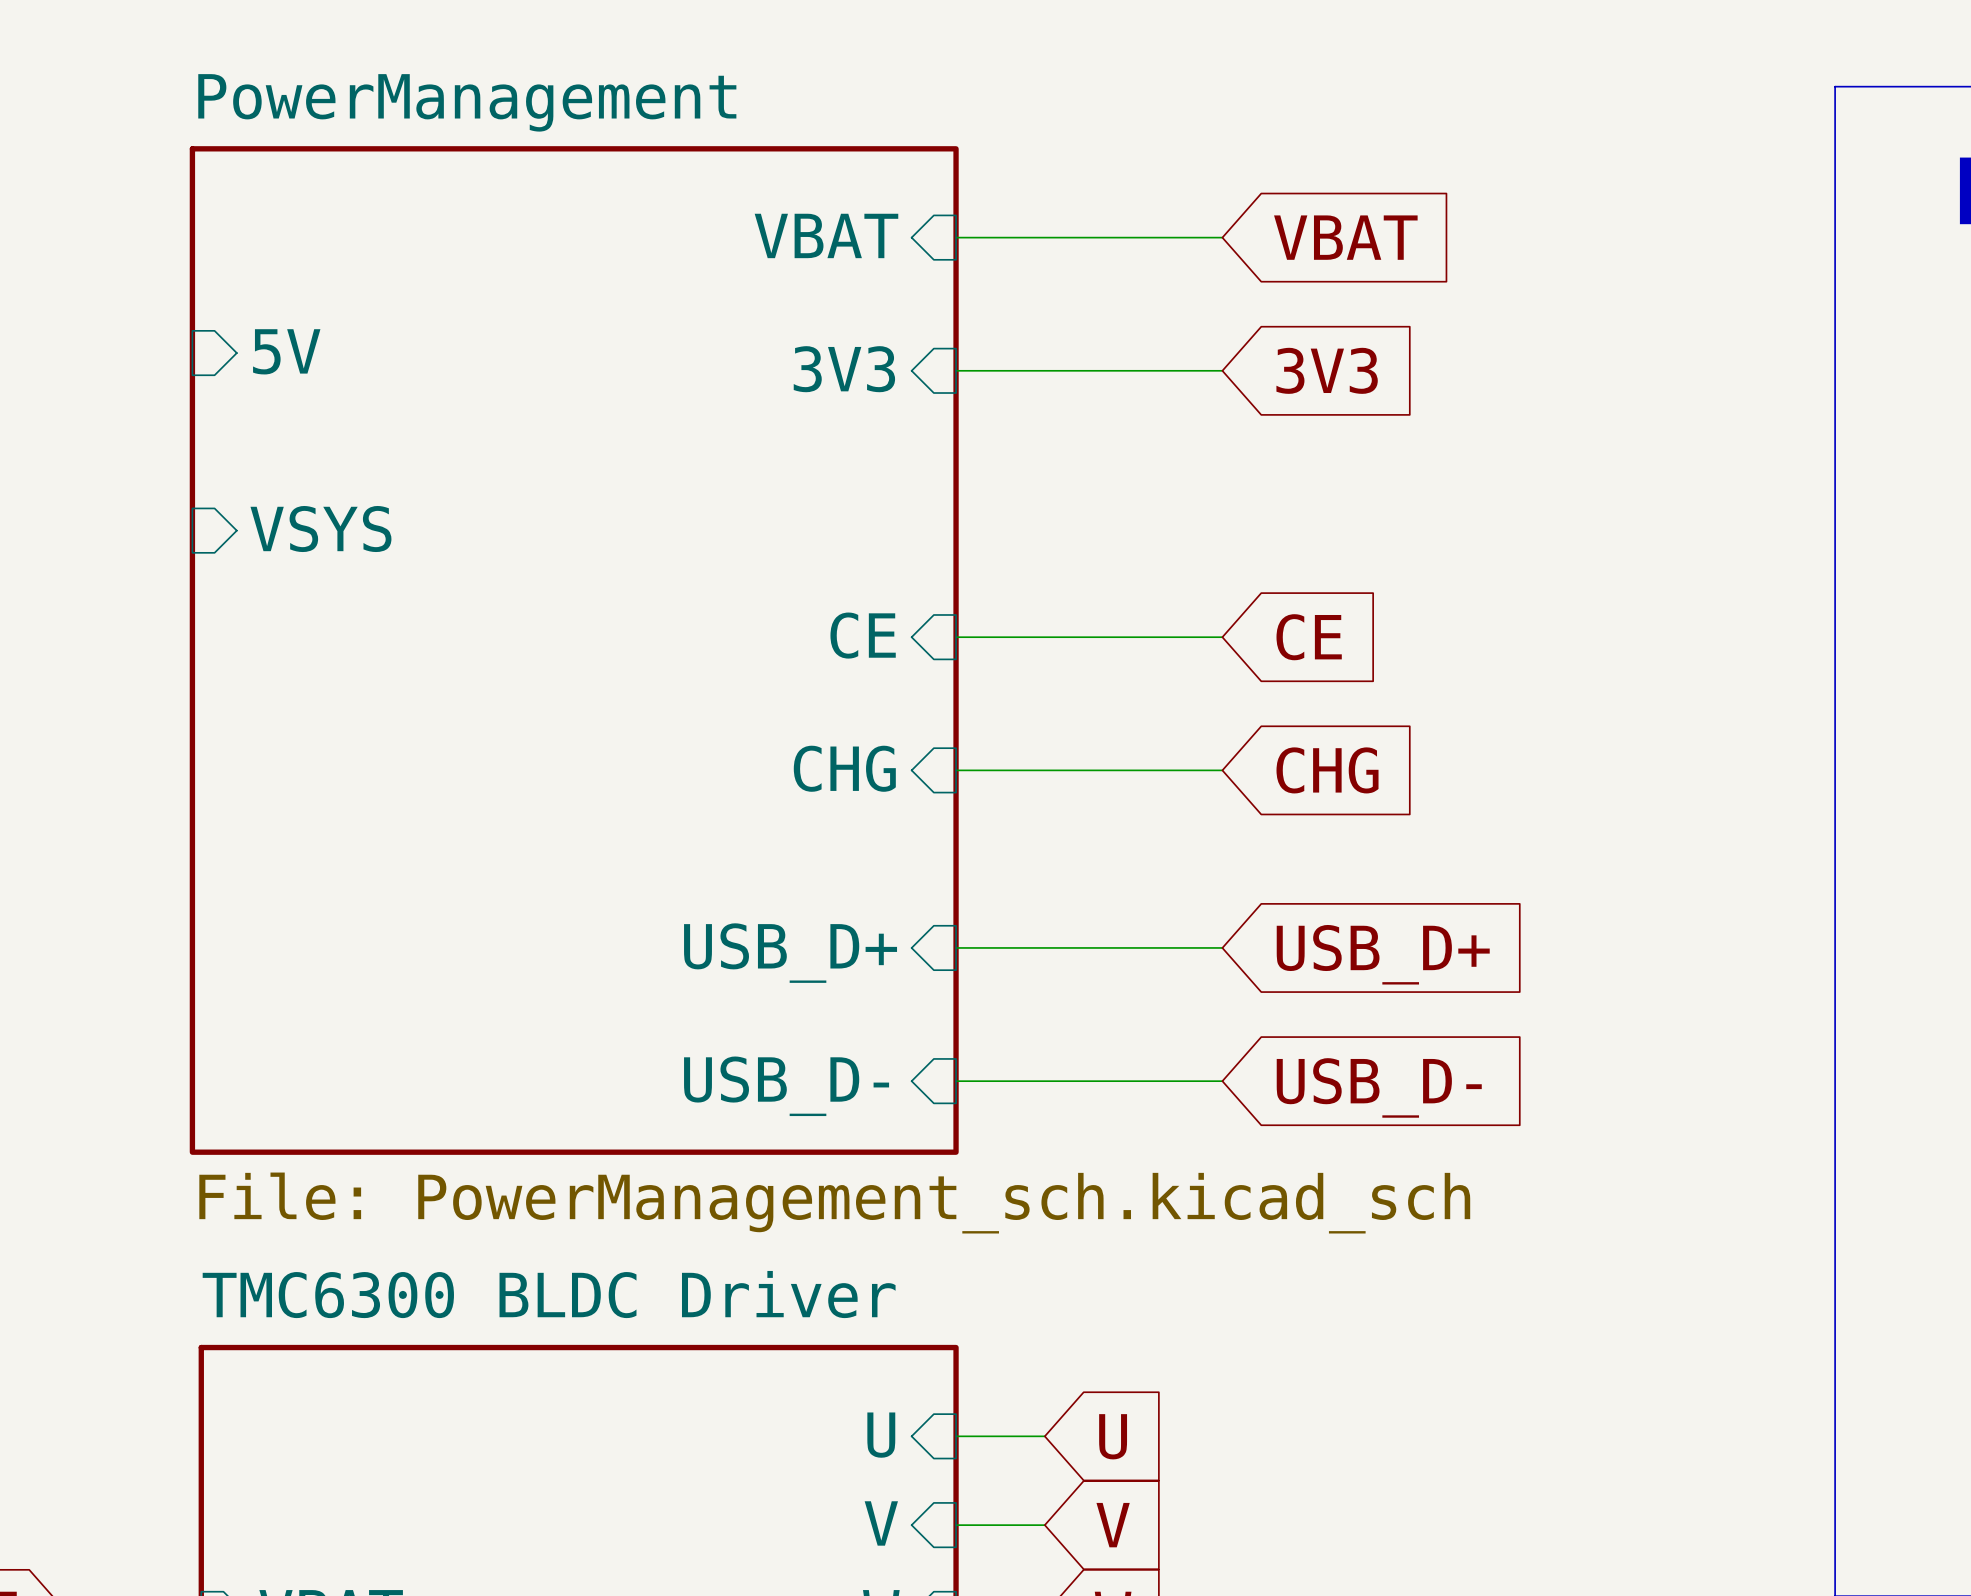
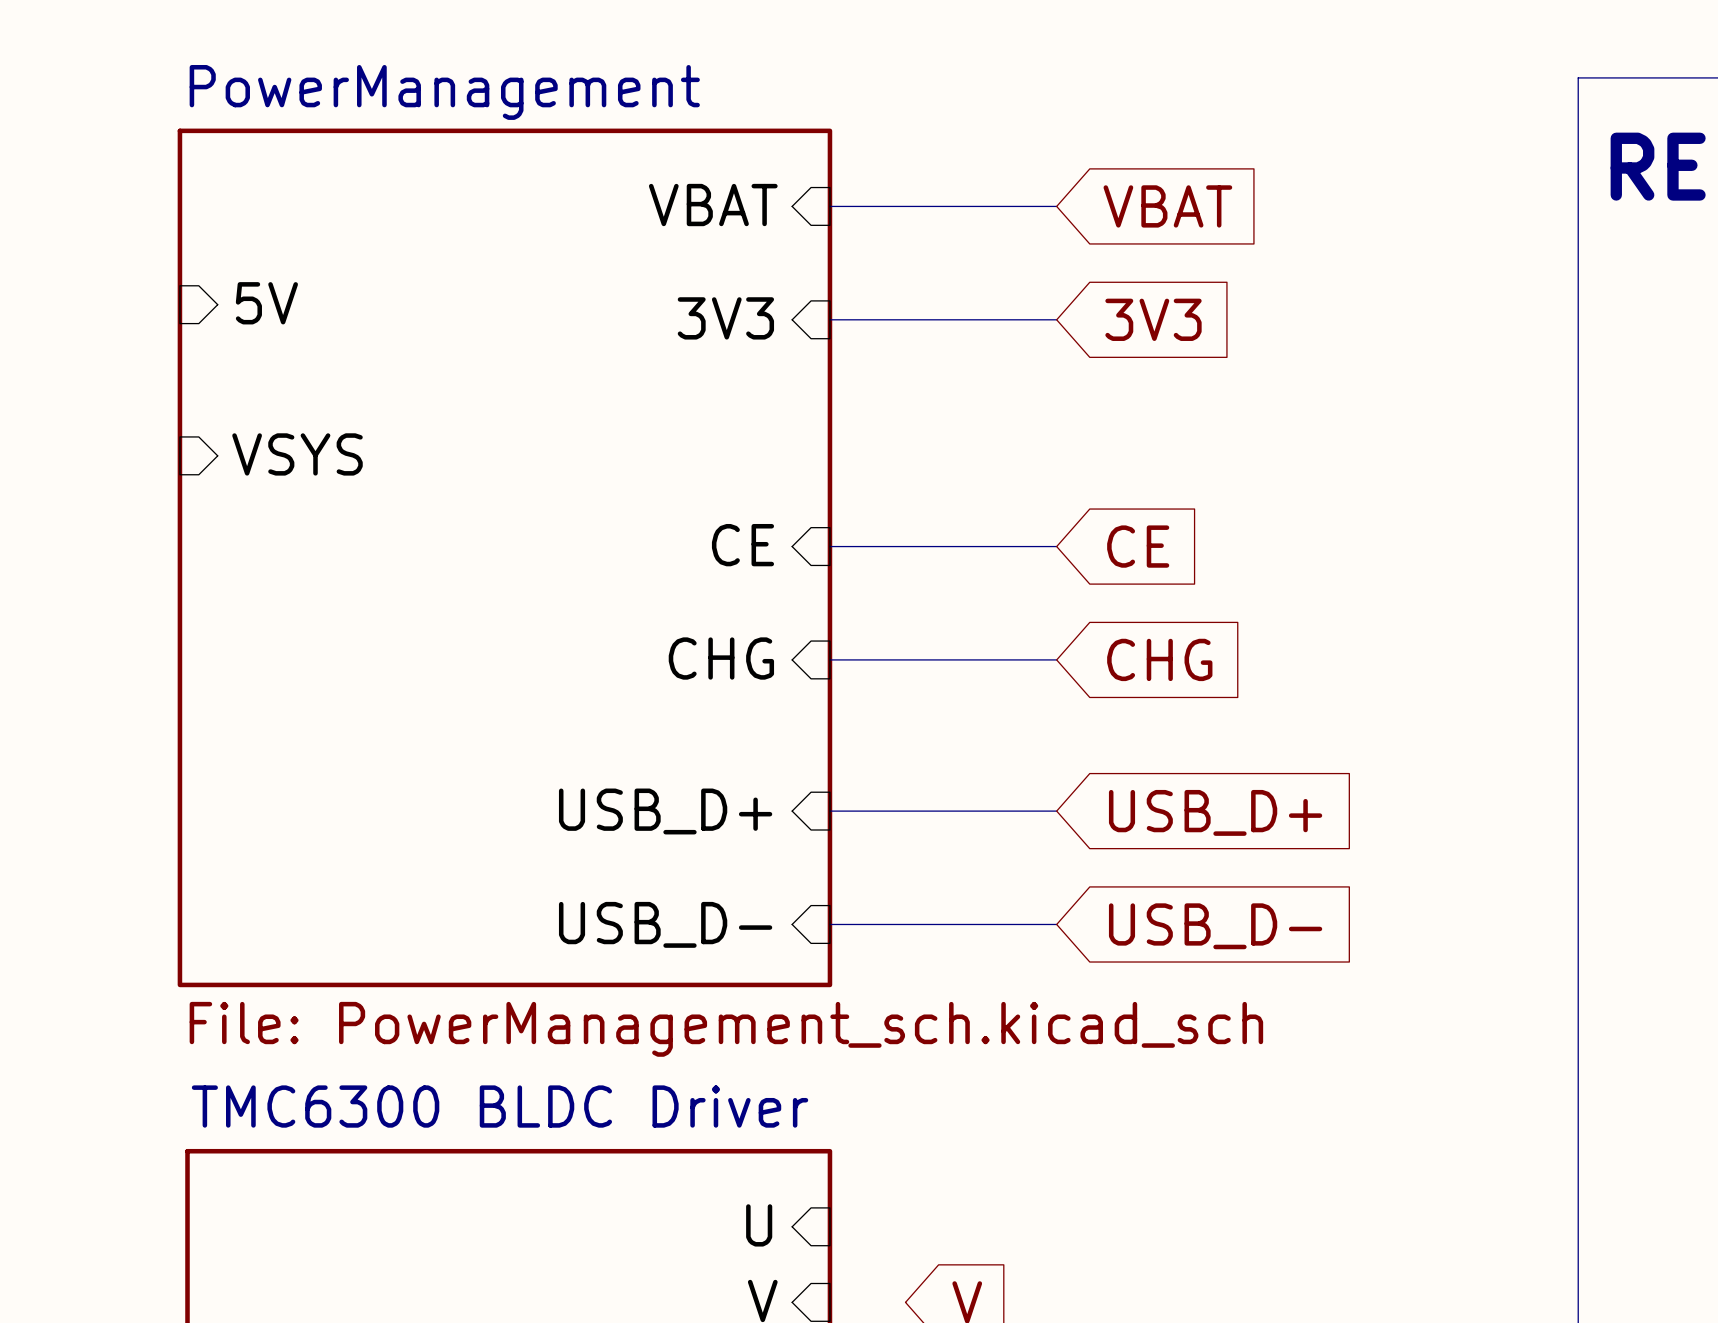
wire: (956, 1436) (1044, 1436) -> none
global label: U (1113, 1436) -> none
wire: (956, 1525) (1044, 1525) -> none

